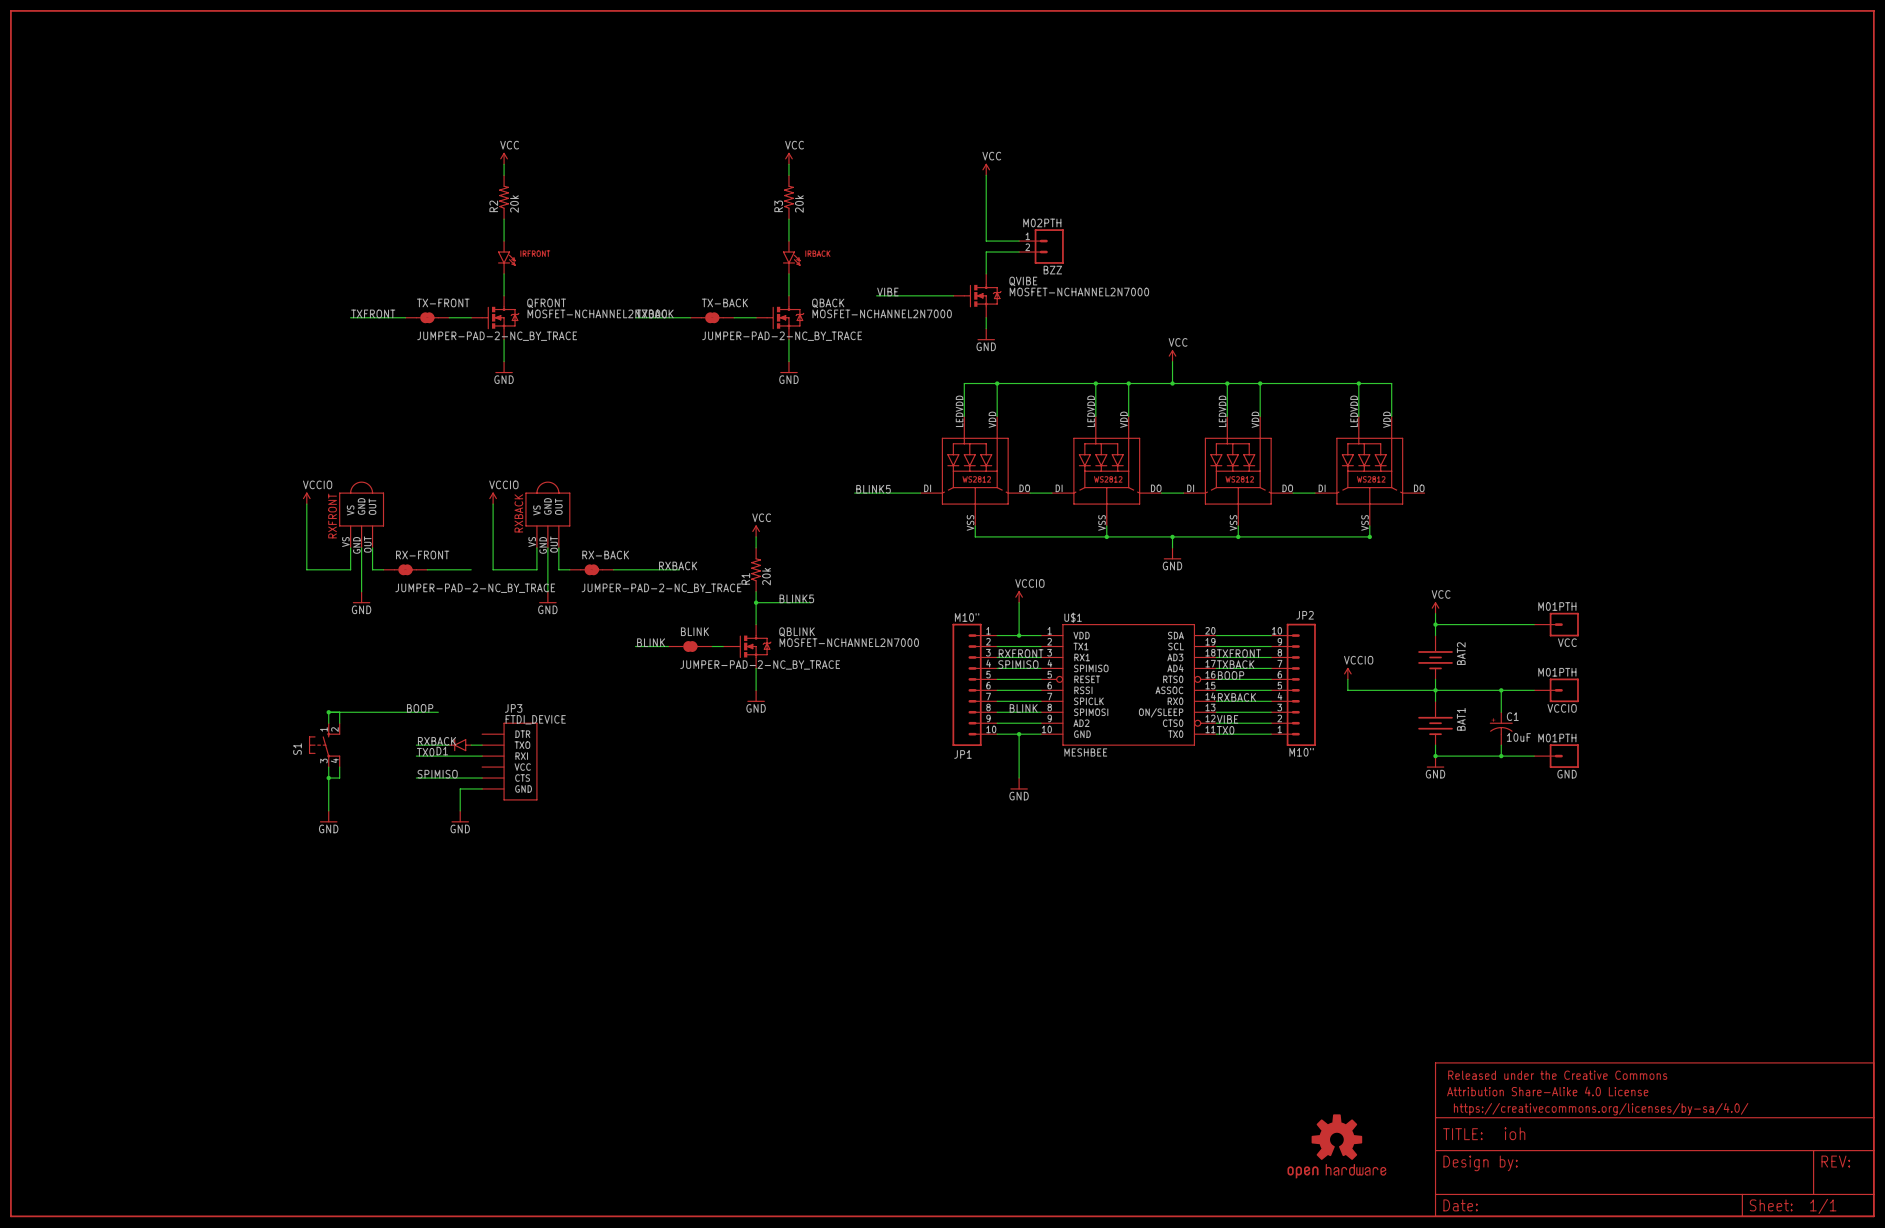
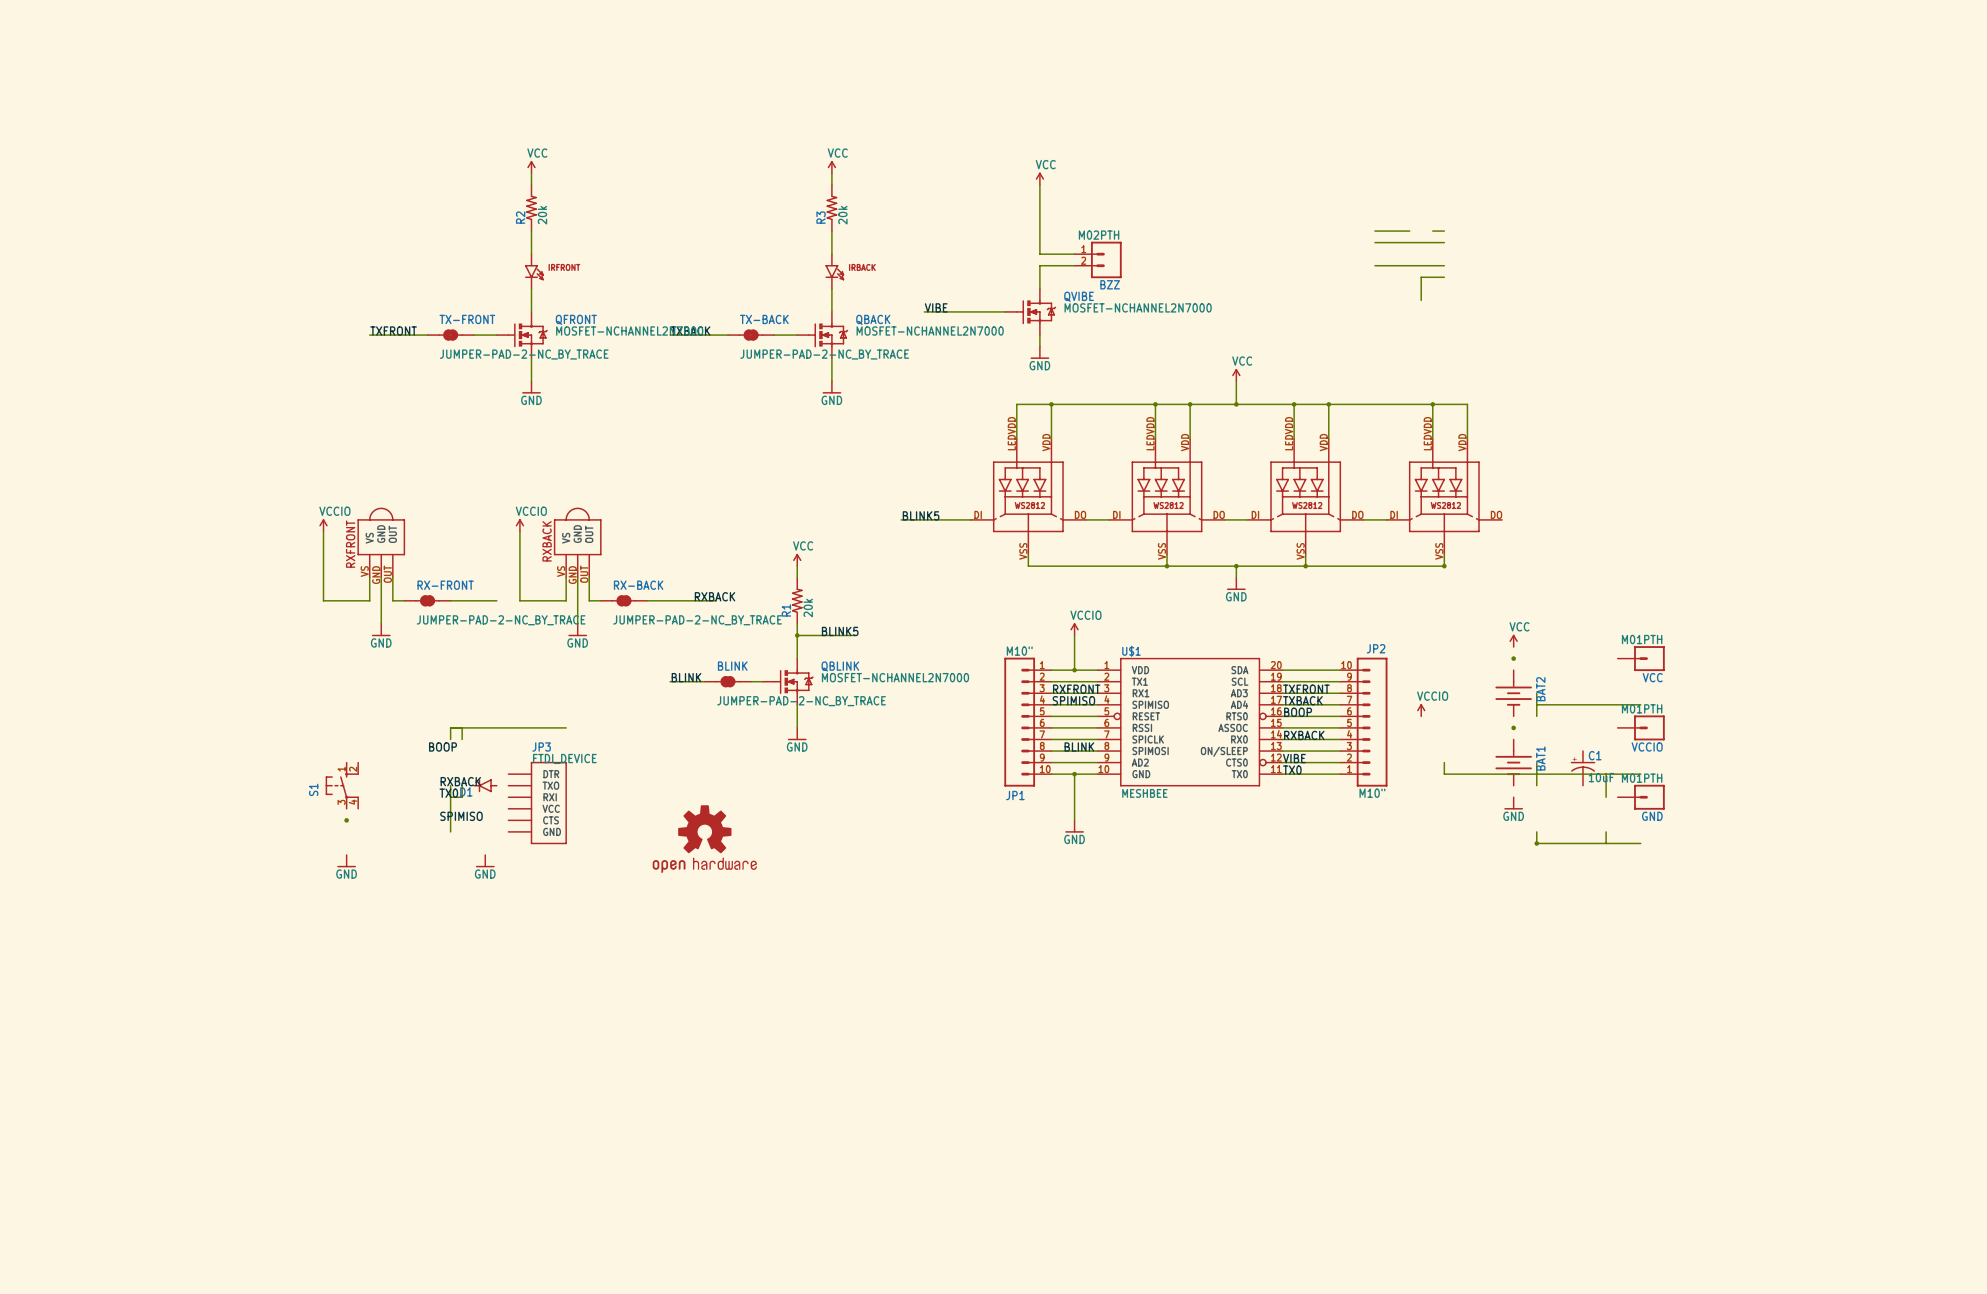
wire: none -> (1375, 231) (1409, 231)
wire: none -> (1432, 231) (1444, 231)
wire: none -> (1375, 242) (1444, 242)
wire: none -> (1375, 265) (1444, 265)
wire: none -> (1444, 277) (1421, 277) (1421, 300)
part: (942, 613) -> none
wire: (1435, 613) (1435, 635) -> (1536, 693) (1536, 716)
wire: (1435, 624) (1534, 624) -> (1536, 704) (1640, 704)
wire: (1347, 679) (1347, 690) (1534, 690) -> (1444, 762) (1444, 774) (1640, 774)
wire: (1435, 679) (1435, 701) -> (1536, 762) (1536, 785)
wire: (1501, 690) (1501, 712) -> (1606, 774) (1606, 797)
junction: (1501, 690) -> none
junction: (328, 712) -> none
wire: (339, 712) (339, 723) -> (462, 727) (462, 739)
wire: (438, 712) (328, 712) (328, 723) -> (566, 727) (450, 727) (450, 739)
wire: (416, 745) (449, 745) -> none
wire: (471, 745) (482, 745) -> none
wire: (1435, 745) (1435, 756) (1534, 756) -> (1536, 831) (1536, 843) (1640, 843)
wire: (1501, 745) (1501, 756) -> (1606, 831) (1606, 843)
wire: (416, 756) (427, 756) -> none
wire: (438, 756) (482, 756) -> (462, 797) (462, 785)
junction: (1435, 756) -> none
junction: (1501, 756) -> none
wire: (328, 767) (328, 810) -> (450, 785) (450, 831)
wire: (339, 767) (339, 778) (328, 778) -> none
wire: (416, 778) (482, 778) -> none
wire: (482, 788) (460, 788) (460, 810) -> none
part: none -> (704, 839)
junction: none -> (1536, 843)
part: (1654, 1139) -> none
part: (1336, 1146) -> none

